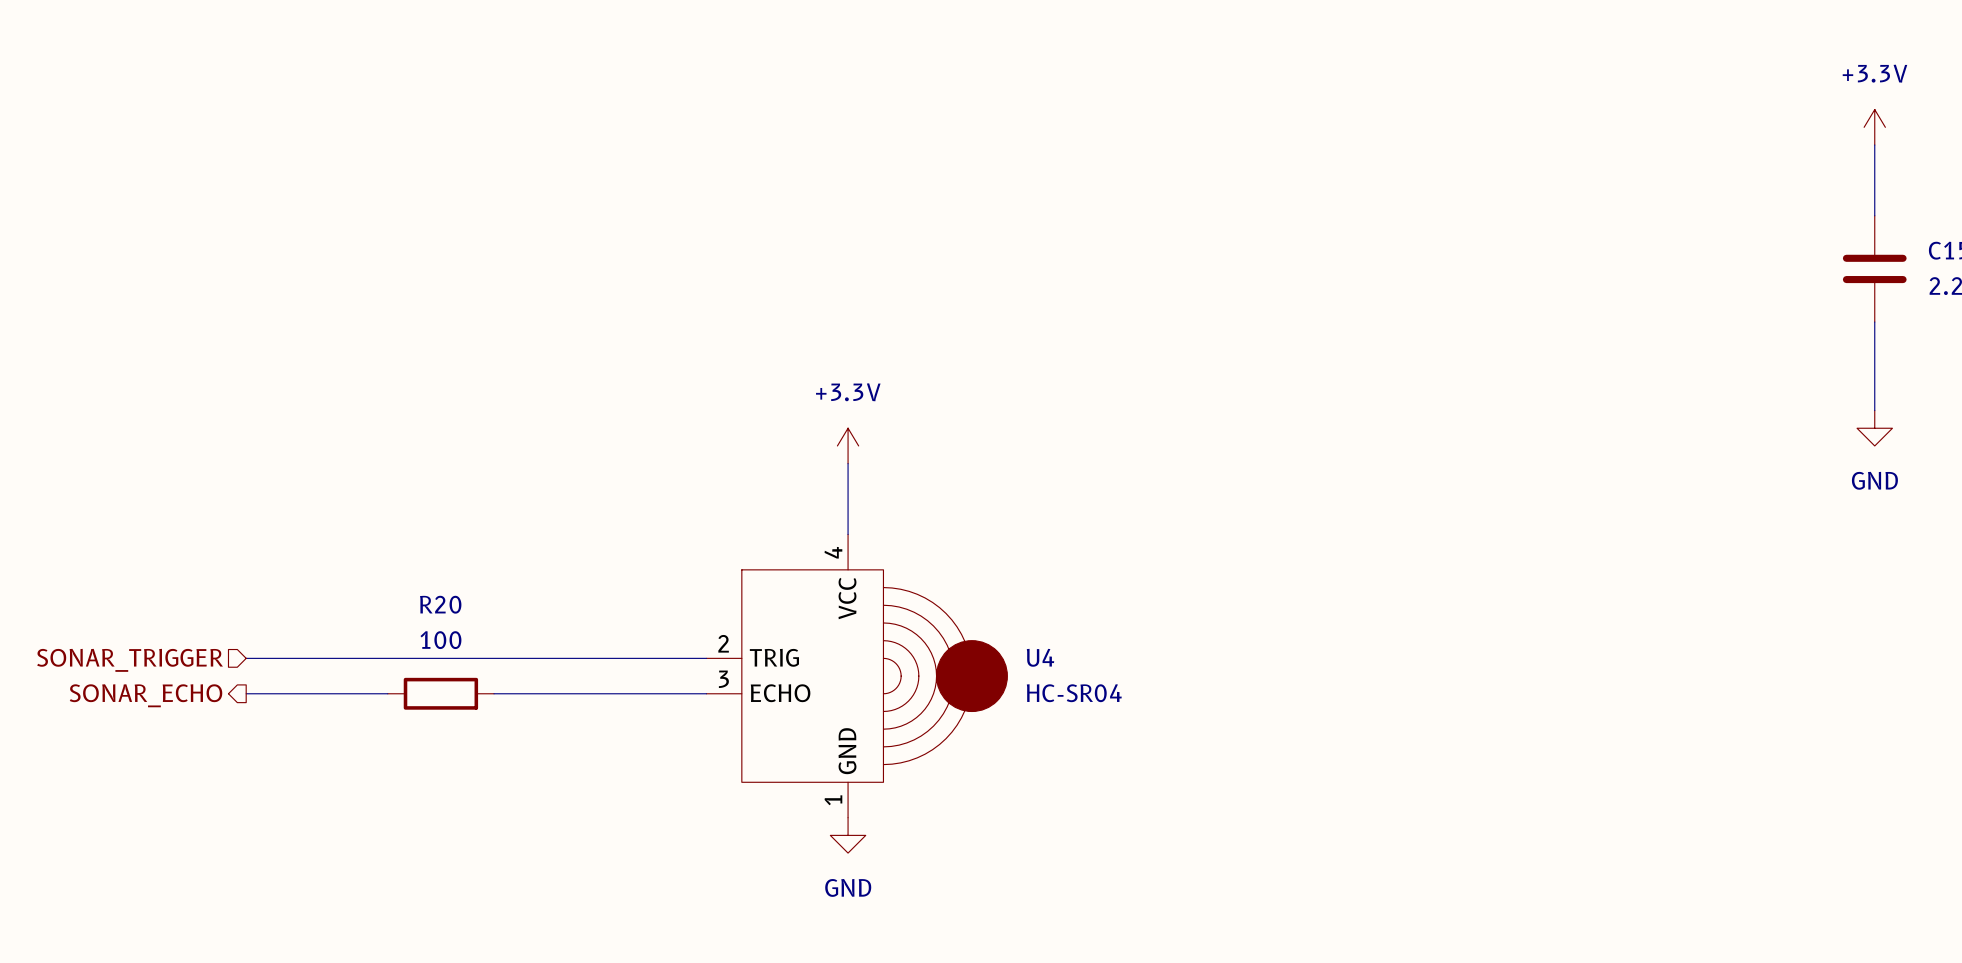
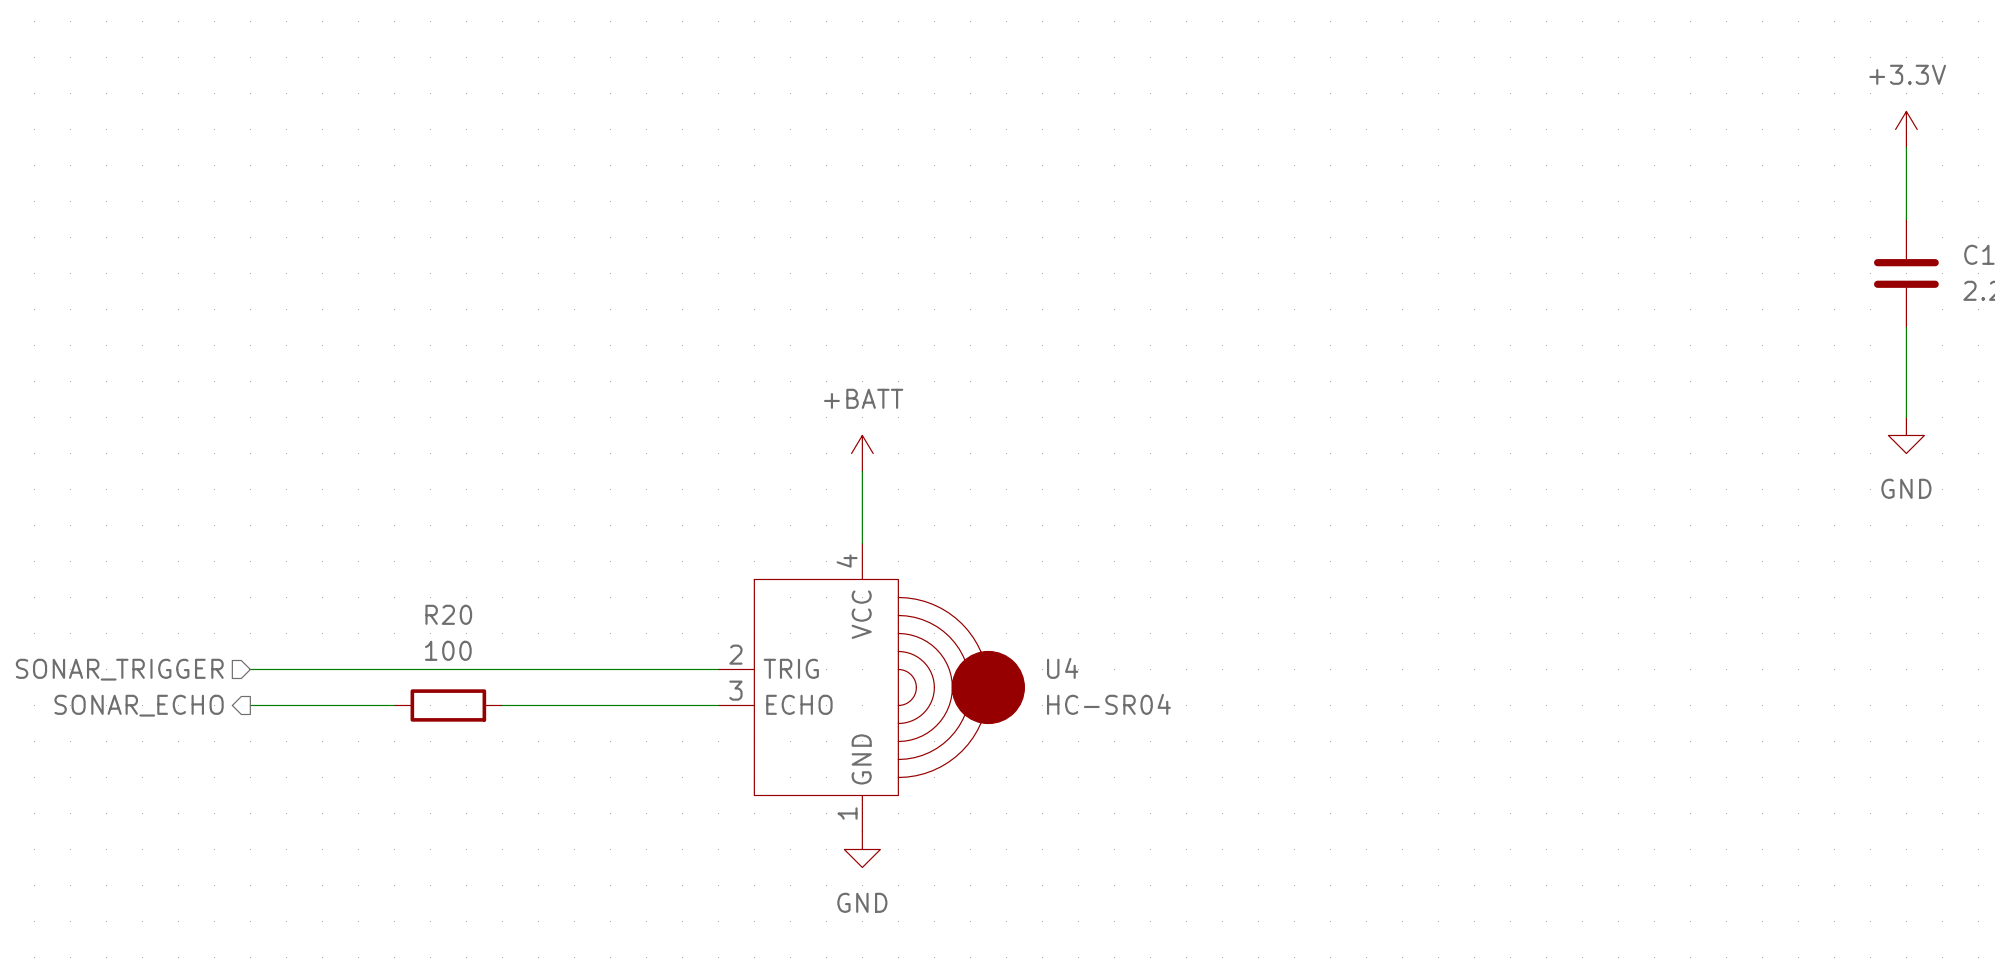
power symbol: +3.3V (848, 445) -> +BATT (862, 453)

